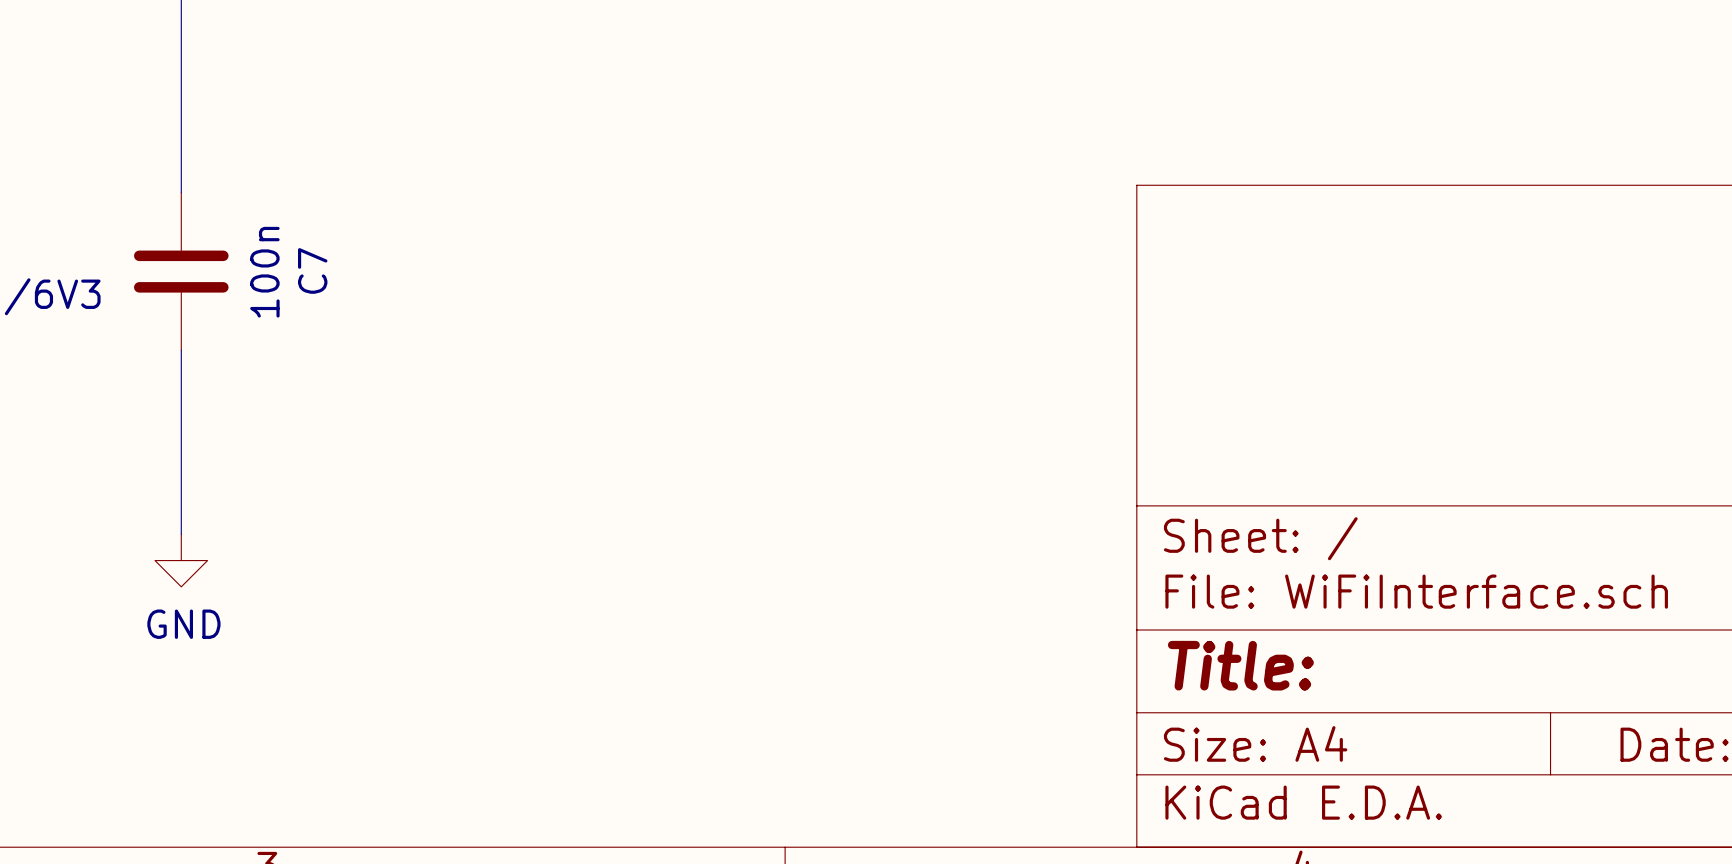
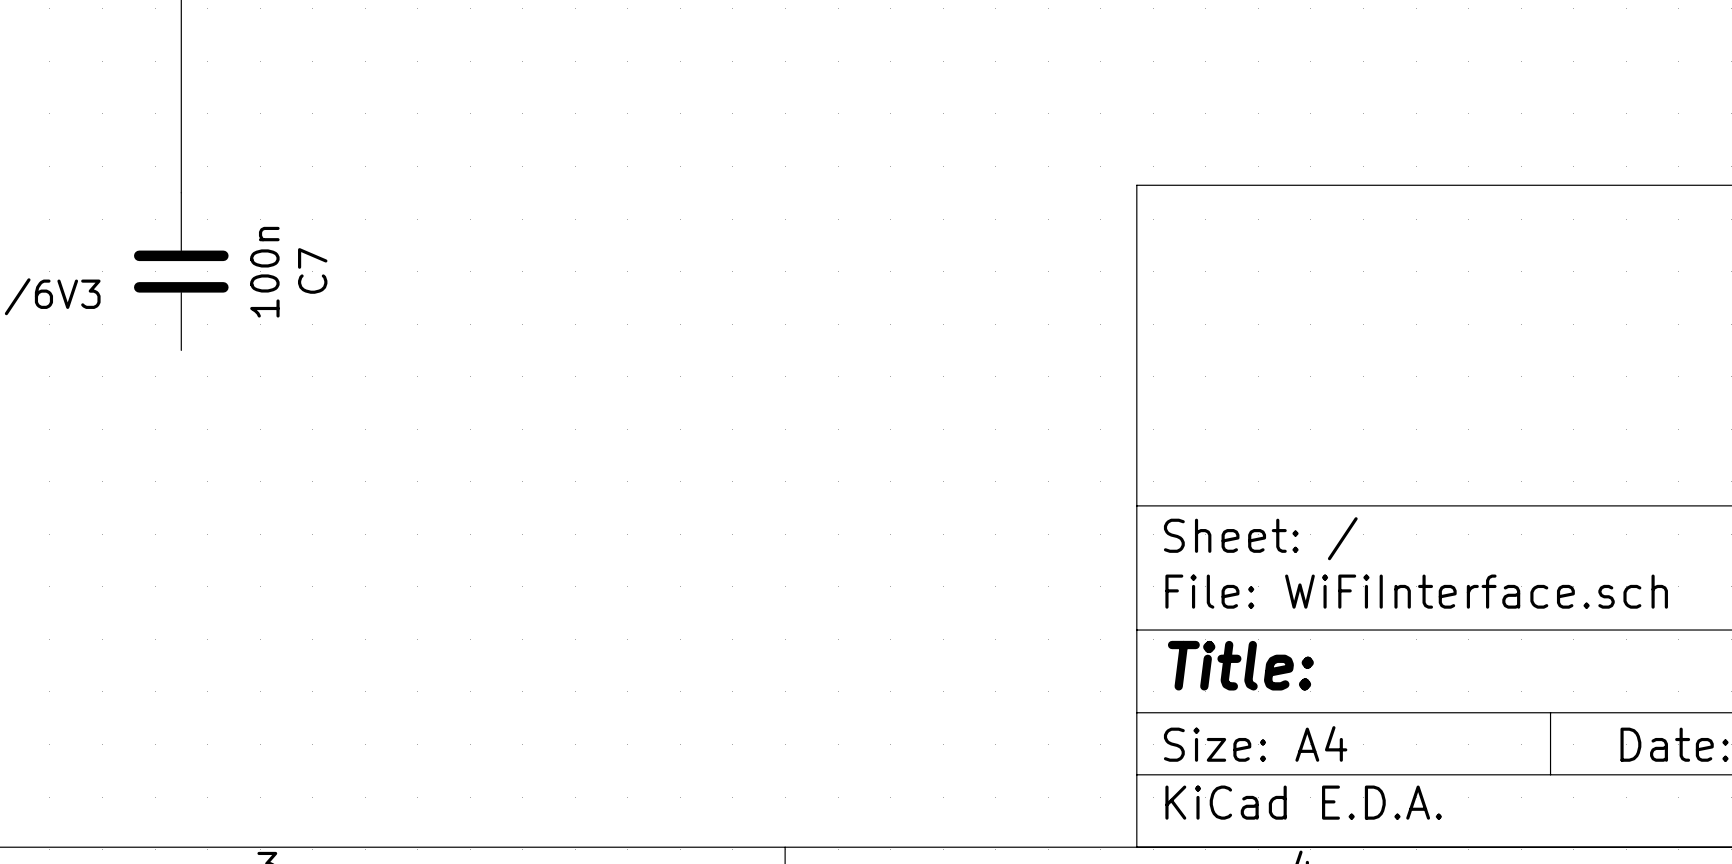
wire: (181, 350) (181, 534) -> none
power symbol: GND (181, 560) -> none

